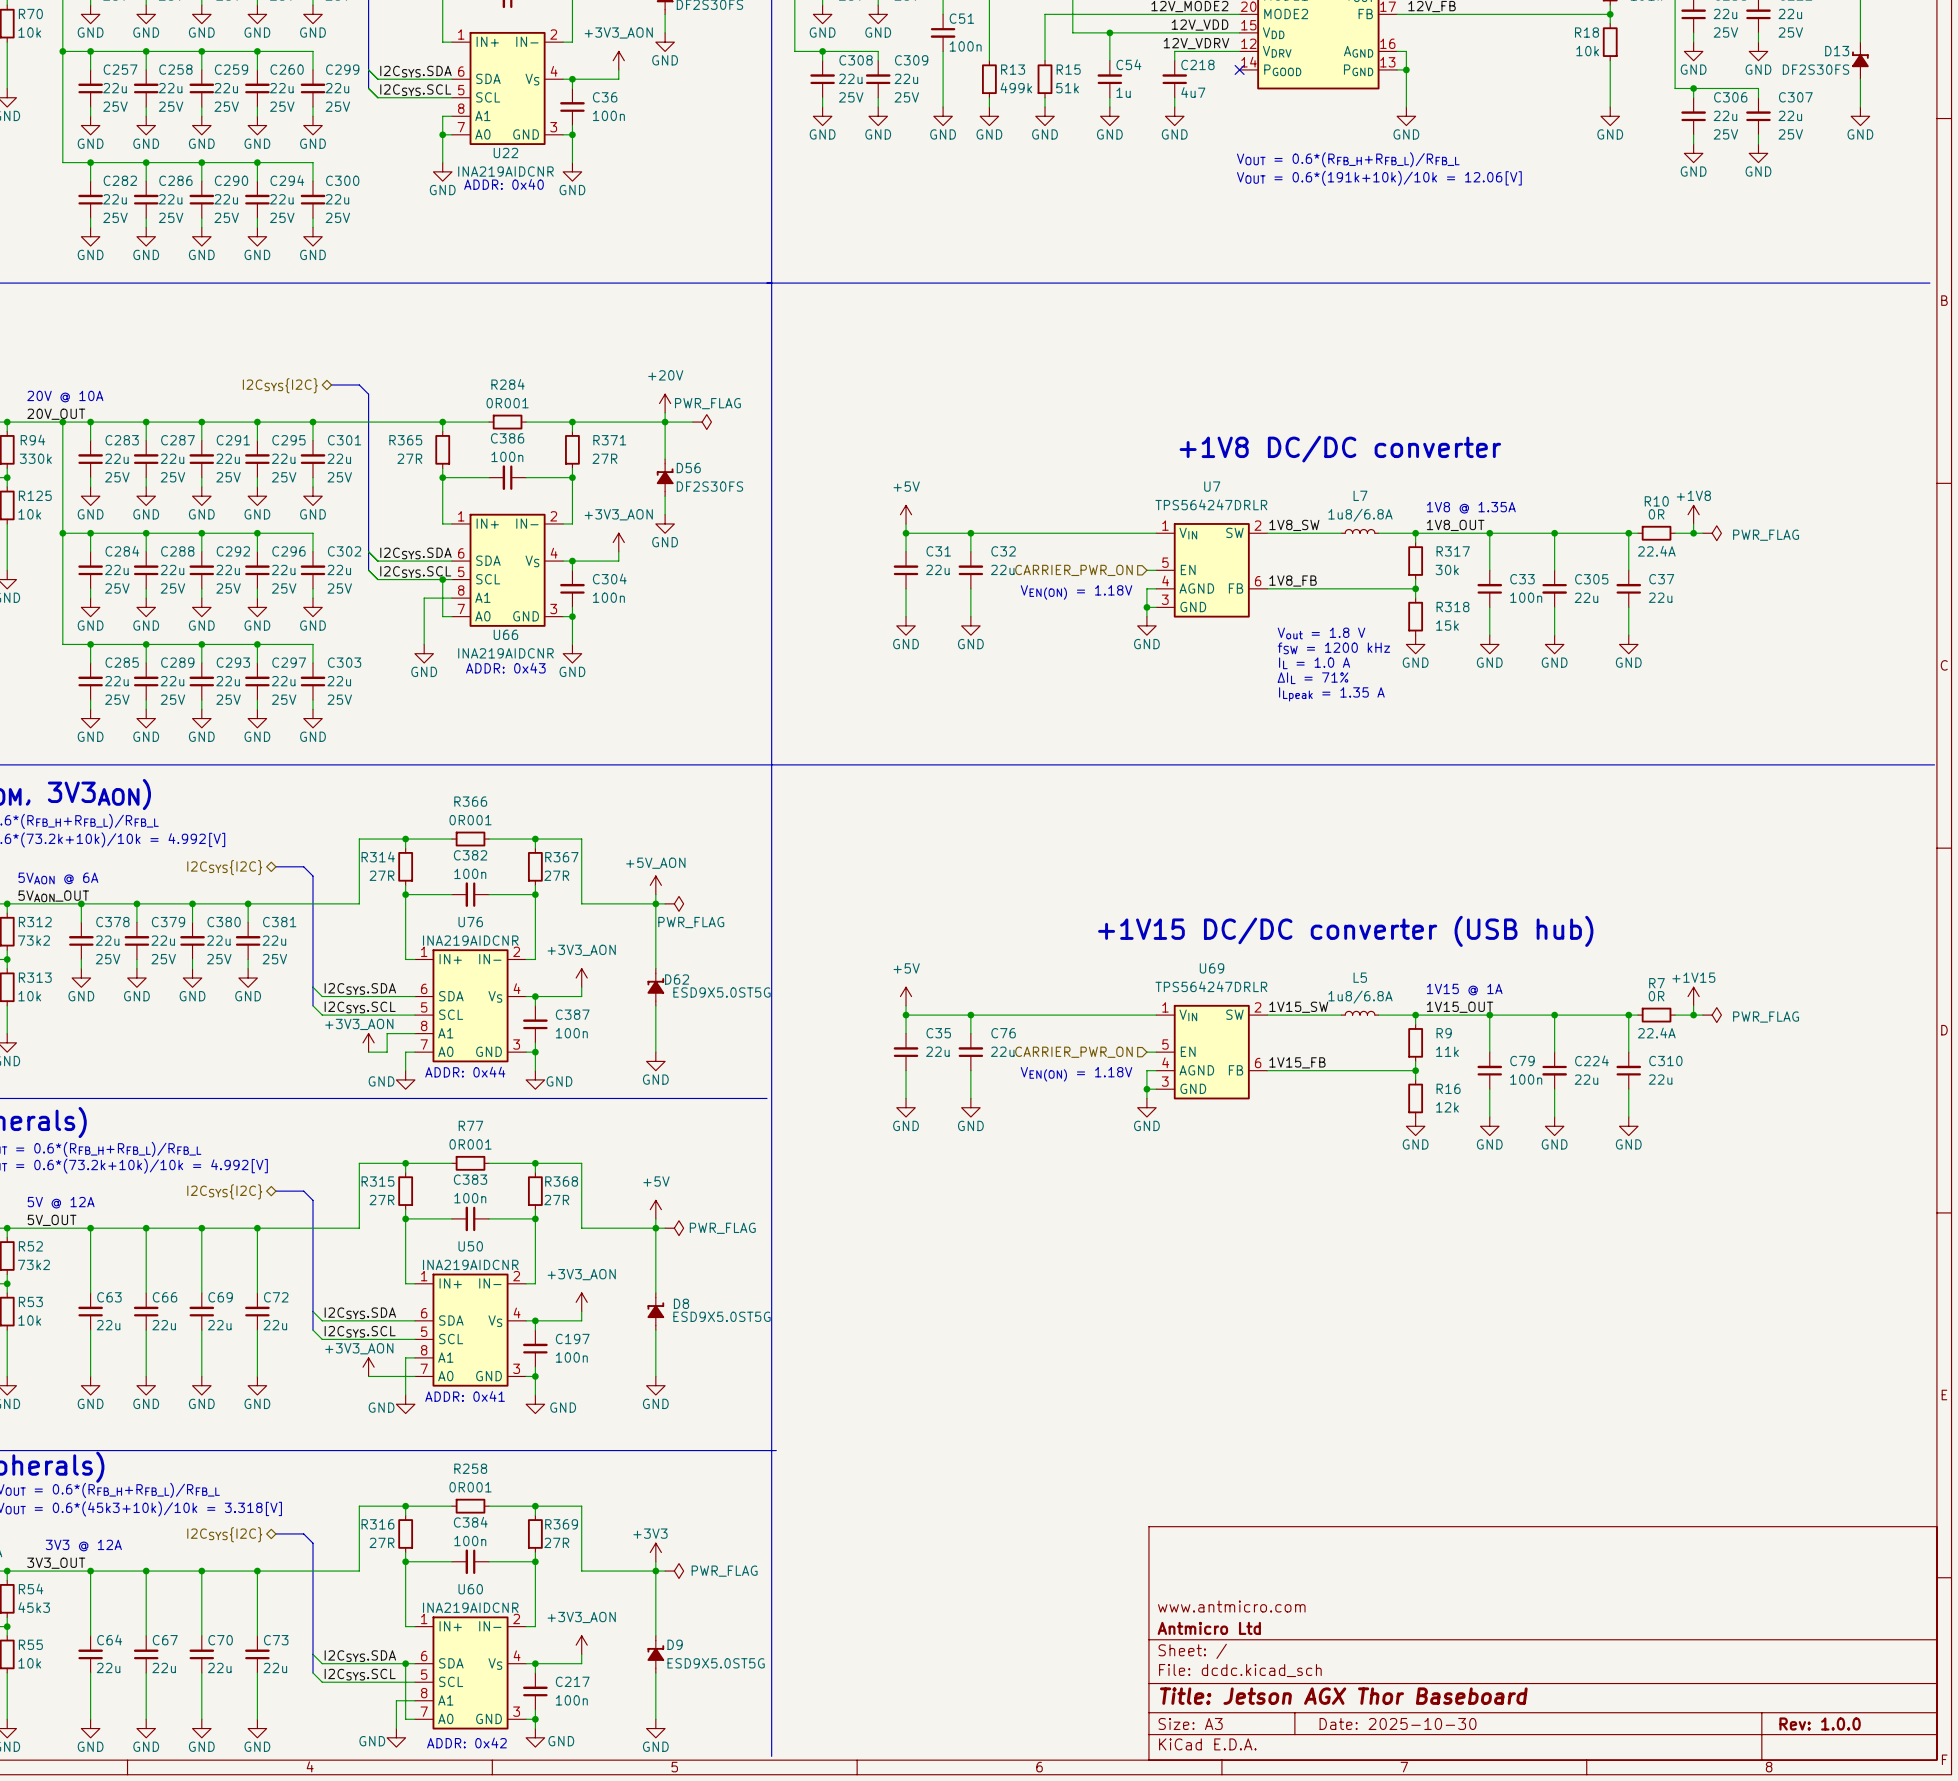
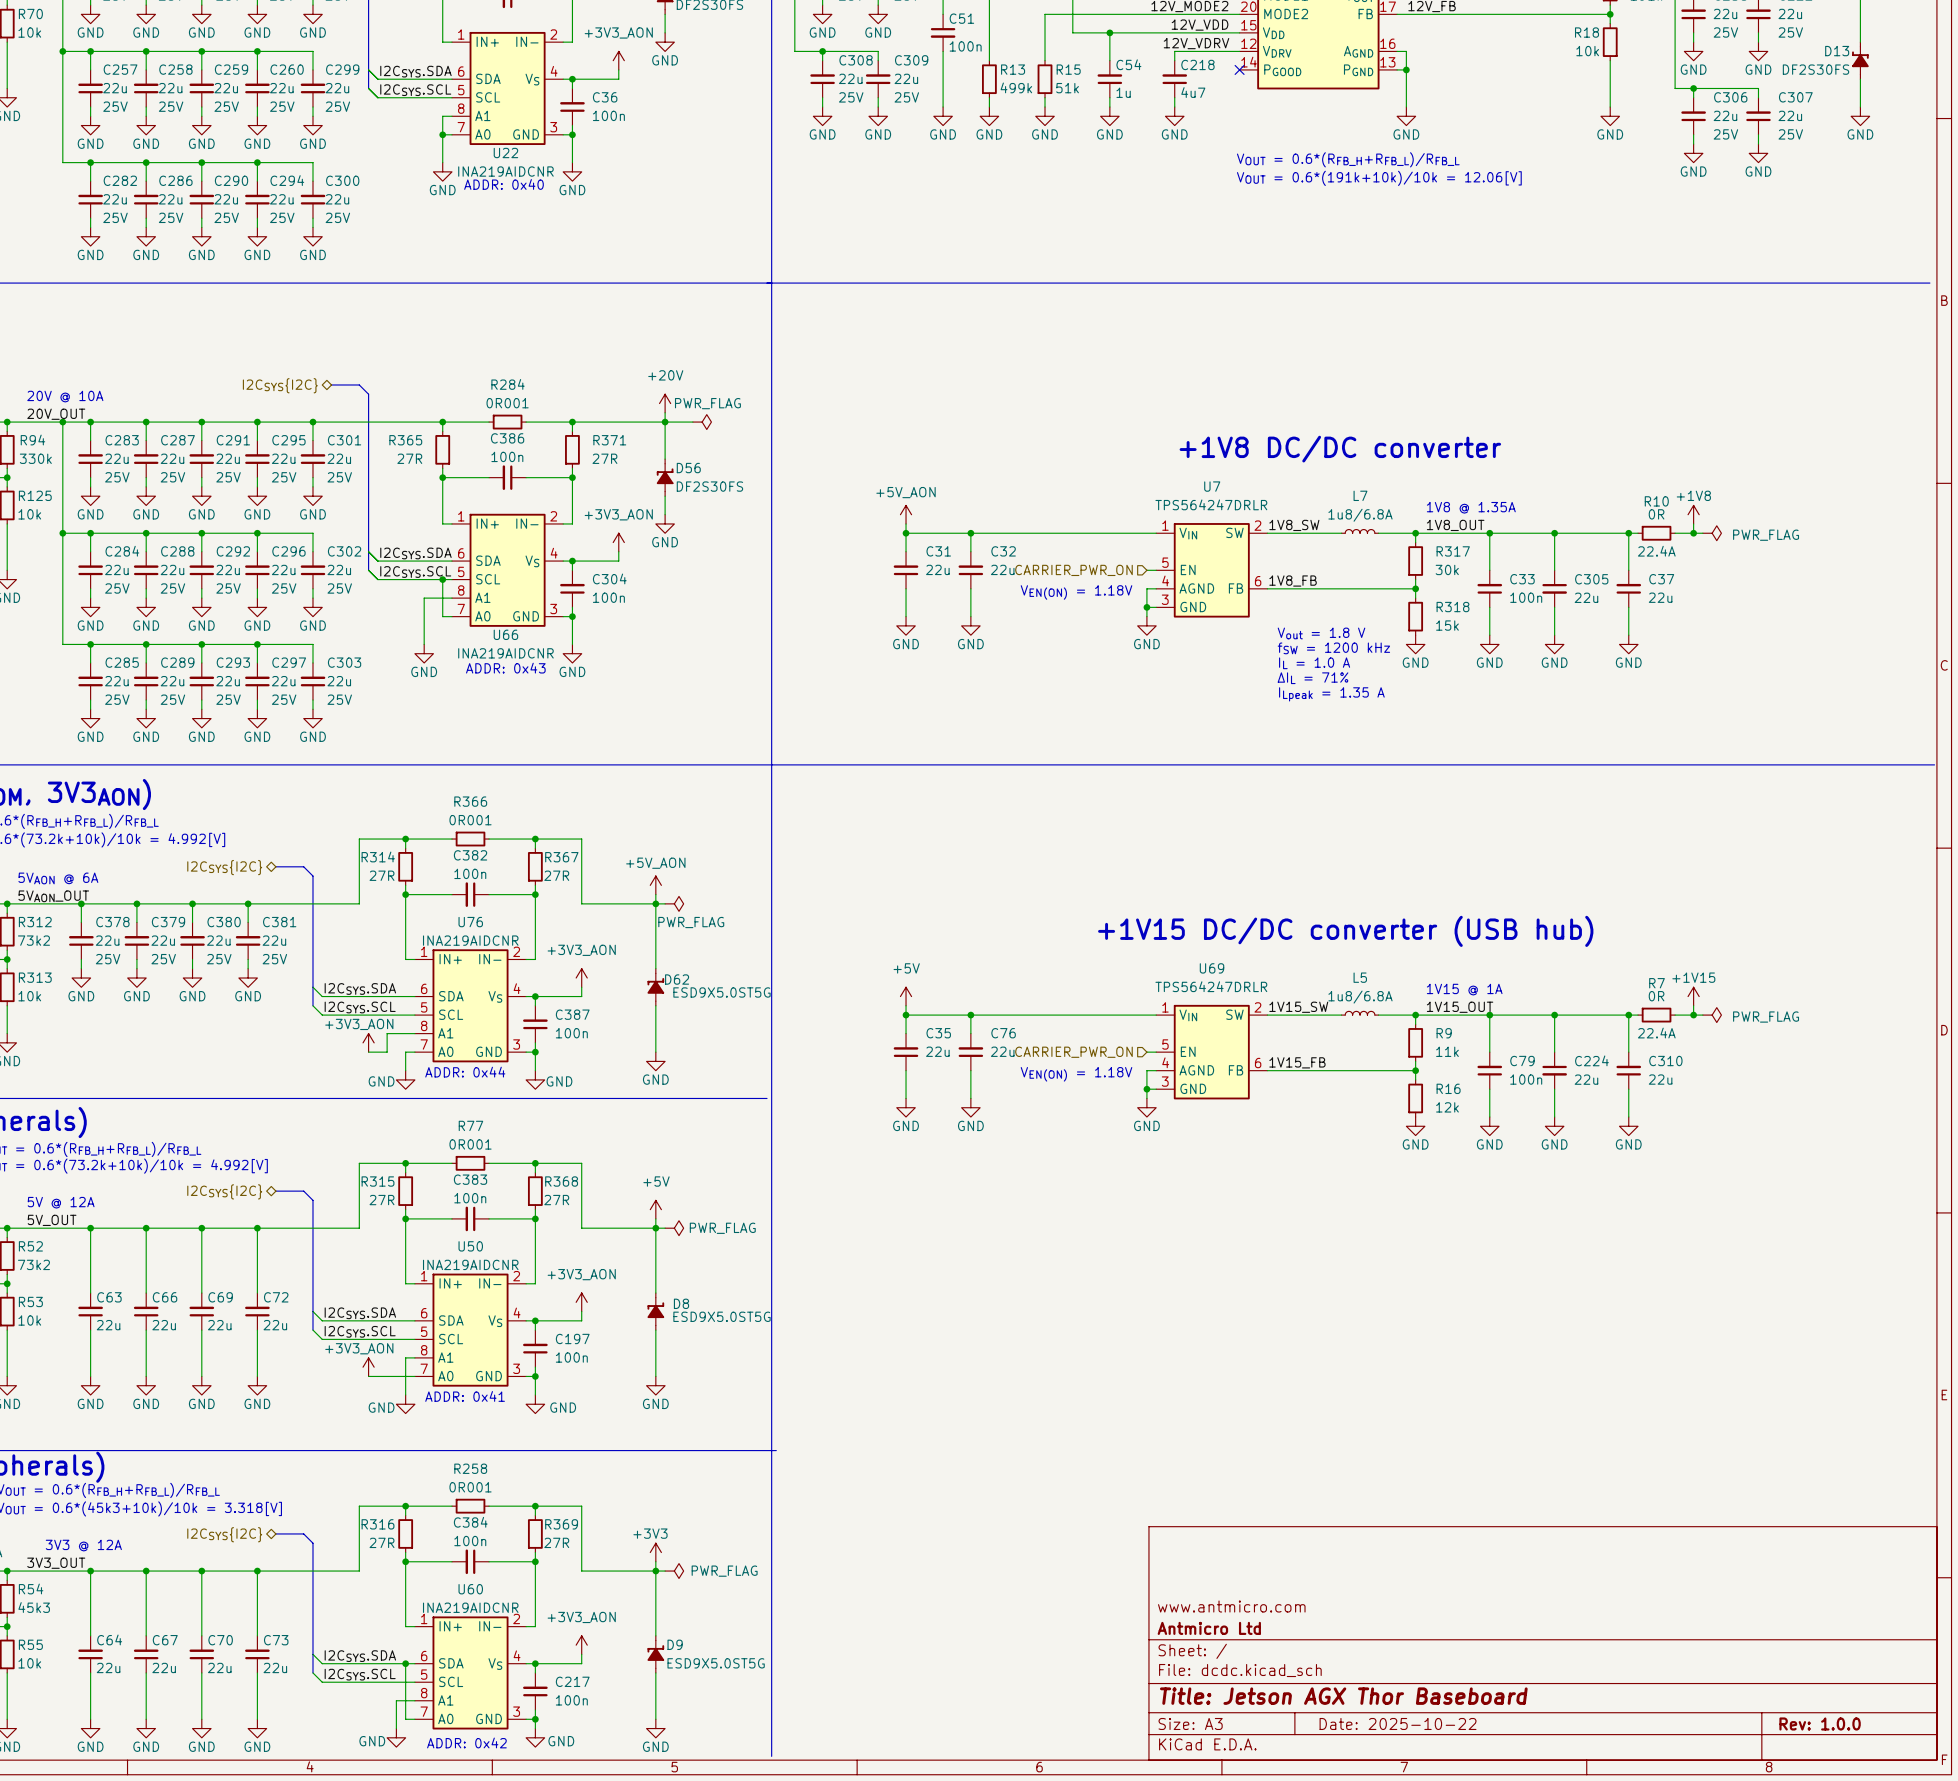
power symbol: +5V (906, 514) -> +5V_AON (906, 514)
title block: Date: 2025-10-30 (1398, 1723) -> Date: 2025-10-22 (1398, 1723)

